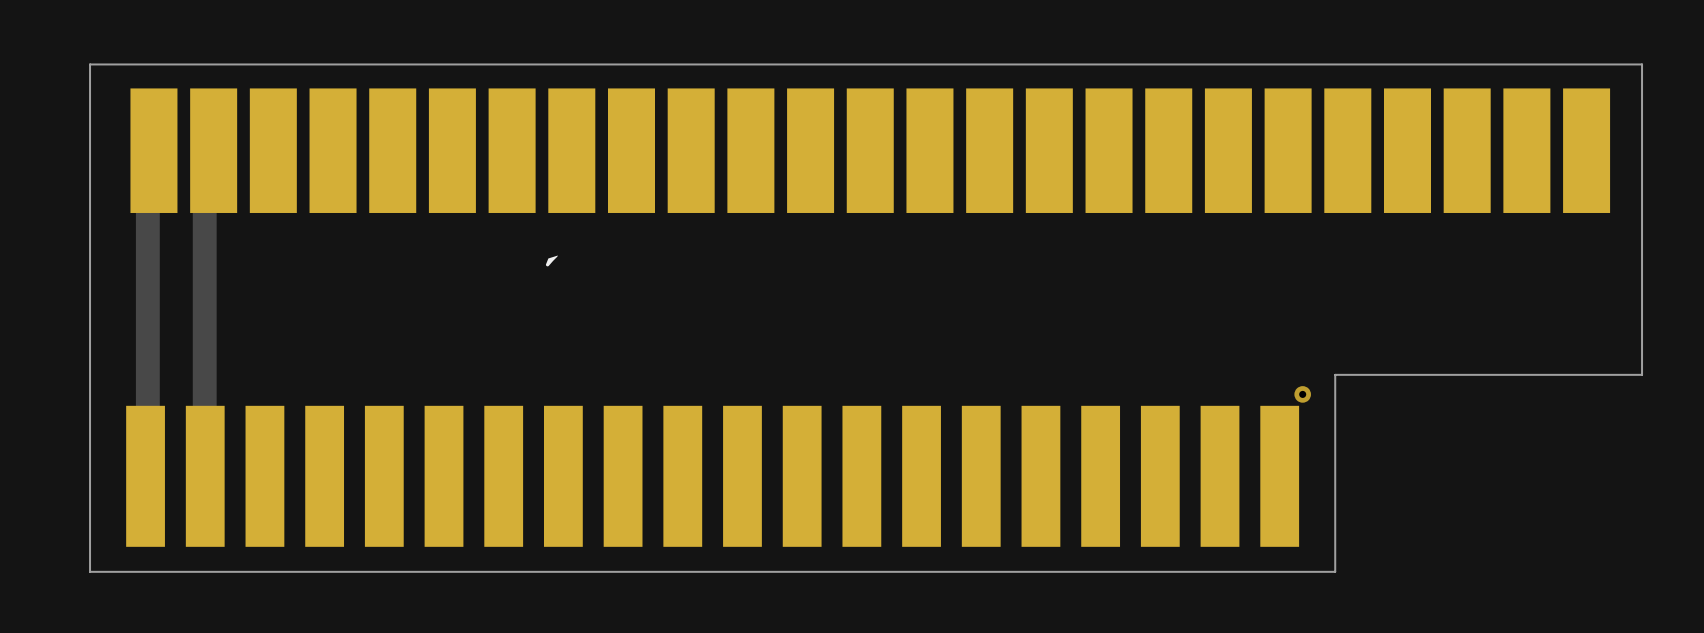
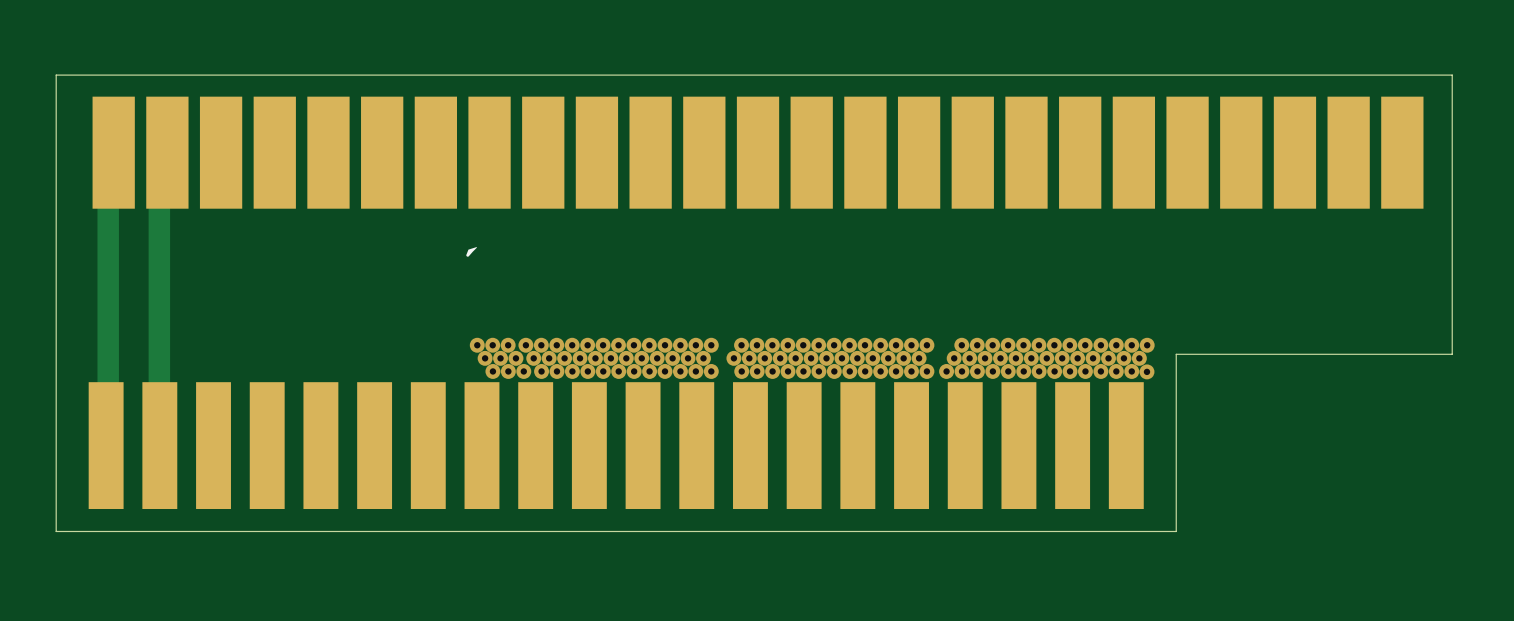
via: none -> (477, 345)
via: none -> (492, 345)
via: none -> (508, 345)
via: none -> (525, 345)
via: none -> (541, 345)
via: none -> (556, 345)
via: none -> (572, 345)
via: none -> (587, 345)
via: none -> (603, 345)
via: none -> (618, 345)
via: none -> (633, 345)
via: none -> (649, 345)
via: none -> (665, 345)
via: none -> (680, 345)
via: none -> (695, 345)
via: none -> (711, 345)
via: none -> (741, 345)
via: none -> (756, 345)
via: none -> (772, 345)
via: none -> (787, 345)
via: none -> (803, 345)
via: none -> (818, 345)
via: none -> (834, 345)
via: none -> (849, 345)
via: none -> (864, 345)
via: none -> (880, 345)
via: none -> (896, 345)
via: none -> (911, 345)
via: none -> (926, 345)
via: none -> (961, 345)
via: none -> (977, 345)
via: none -> (992, 345)
via: none -> (1008, 345)
via: none -> (1023, 345)
via: none -> (1038, 345)
via: none -> (1054, 345)
via: none -> (1069, 345)
via: none -> (1085, 345)
via: none -> (1100, 345)
via: none -> (1116, 345)
via: none -> (1131, 345)
via: none -> (1147, 345)
via: none -> (485, 358)
via: none -> (500, 358)
via: none -> (515, 358)
via: none -> (533, 358)
via: none -> (549, 358)
via: none -> (564, 358)
via: none -> (580, 358)
via: none -> (595, 358)
via: none -> (610, 358)
via: none -> (626, 358)
via: none -> (641, 358)
via: none -> (657, 358)
via: none -> (672, 358)
via: none -> (688, 358)
via: none -> (703, 358)
via: none -> (733, 358)
via: none -> (749, 358)
via: none -> (764, 358)
via: none -> (780, 358)
via: none -> (795, 358)
via: none -> (811, 358)
via: none -> (826, 358)
via: none -> (841, 358)
via: none -> (857, 358)
via: none -> (872, 358)
via: none -> (888, 358)
via: none -> (903, 358)
via: none -> (919, 358)
via: none -> (954, 358)
via: none -> (969, 358)
via: none -> (985, 358)
via: none -> (1000, 358)
via: none -> (1015, 358)
via: none -> (1031, 358)
via: none -> (1046, 358)
via: none -> (1062, 358)
via: none -> (1077, 358)
via: none -> (1093, 358)
via: none -> (1108, 358)
via: none -> (1123, 358)
via: none -> (1139, 358)
via: none -> (492, 371)
via: none -> (508, 371)
via: none -> (523, 371)
via: none -> (541, 371)
via: none -> (556, 371)
via: none -> (572, 371)
via: none -> (587, 371)
via: none -> (603, 371)
via: none -> (618, 371)
via: none -> (634, 371)
via: none -> (649, 371)
via: none -> (665, 371)
via: none -> (680, 371)
via: none -> (695, 371)
via: none -> (711, 371)
via: none -> (741, 371)
via: none -> (757, 371)
via: none -> (772, 371)
via: none -> (788, 371)
via: none -> (803, 371)
via: none -> (818, 371)
via: none -> (834, 371)
via: none -> (849, 371)
via: none -> (865, 371)
via: none -> (880, 371)
via: none -> (896, 371)
via: none -> (911, 371)
via: none -> (926, 371)
via: none -> (946, 371)
via: none -> (962, 371)
via: none -> (977, 371)
via: none -> (992, 371)
via: none -> (1008, 371)
via: none -> (1023, 371)
via: none -> (1039, 371)
via: none -> (1054, 371)
via: none -> (1070, 371)
via: none -> (1085, 371)
via: none -> (1100, 371)
via: none -> (1116, 371)
via: none -> (1131, 371)

